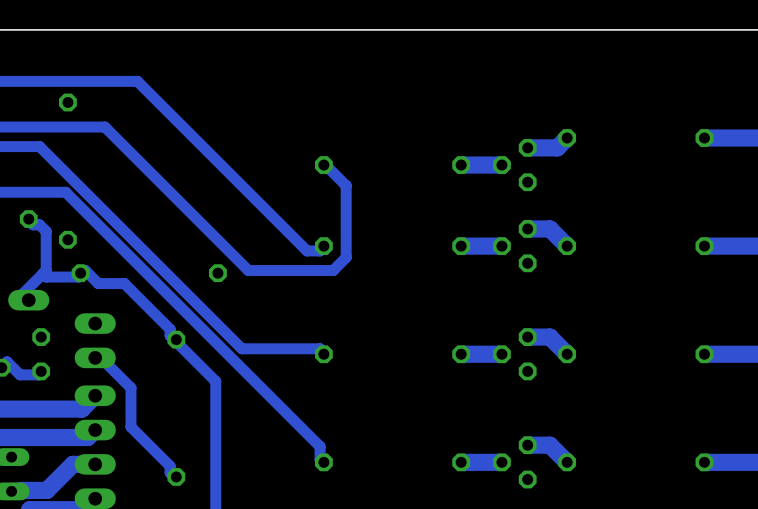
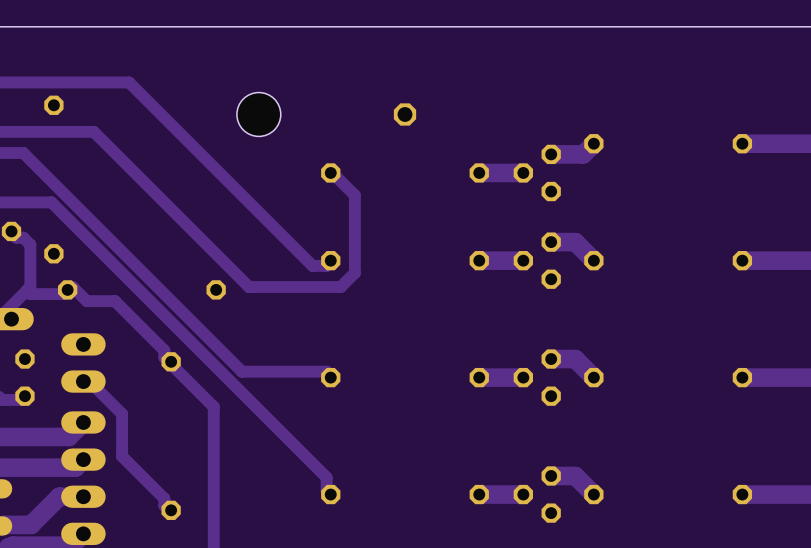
hole: none -> (258, 114)
part: none -> (405, 114)

